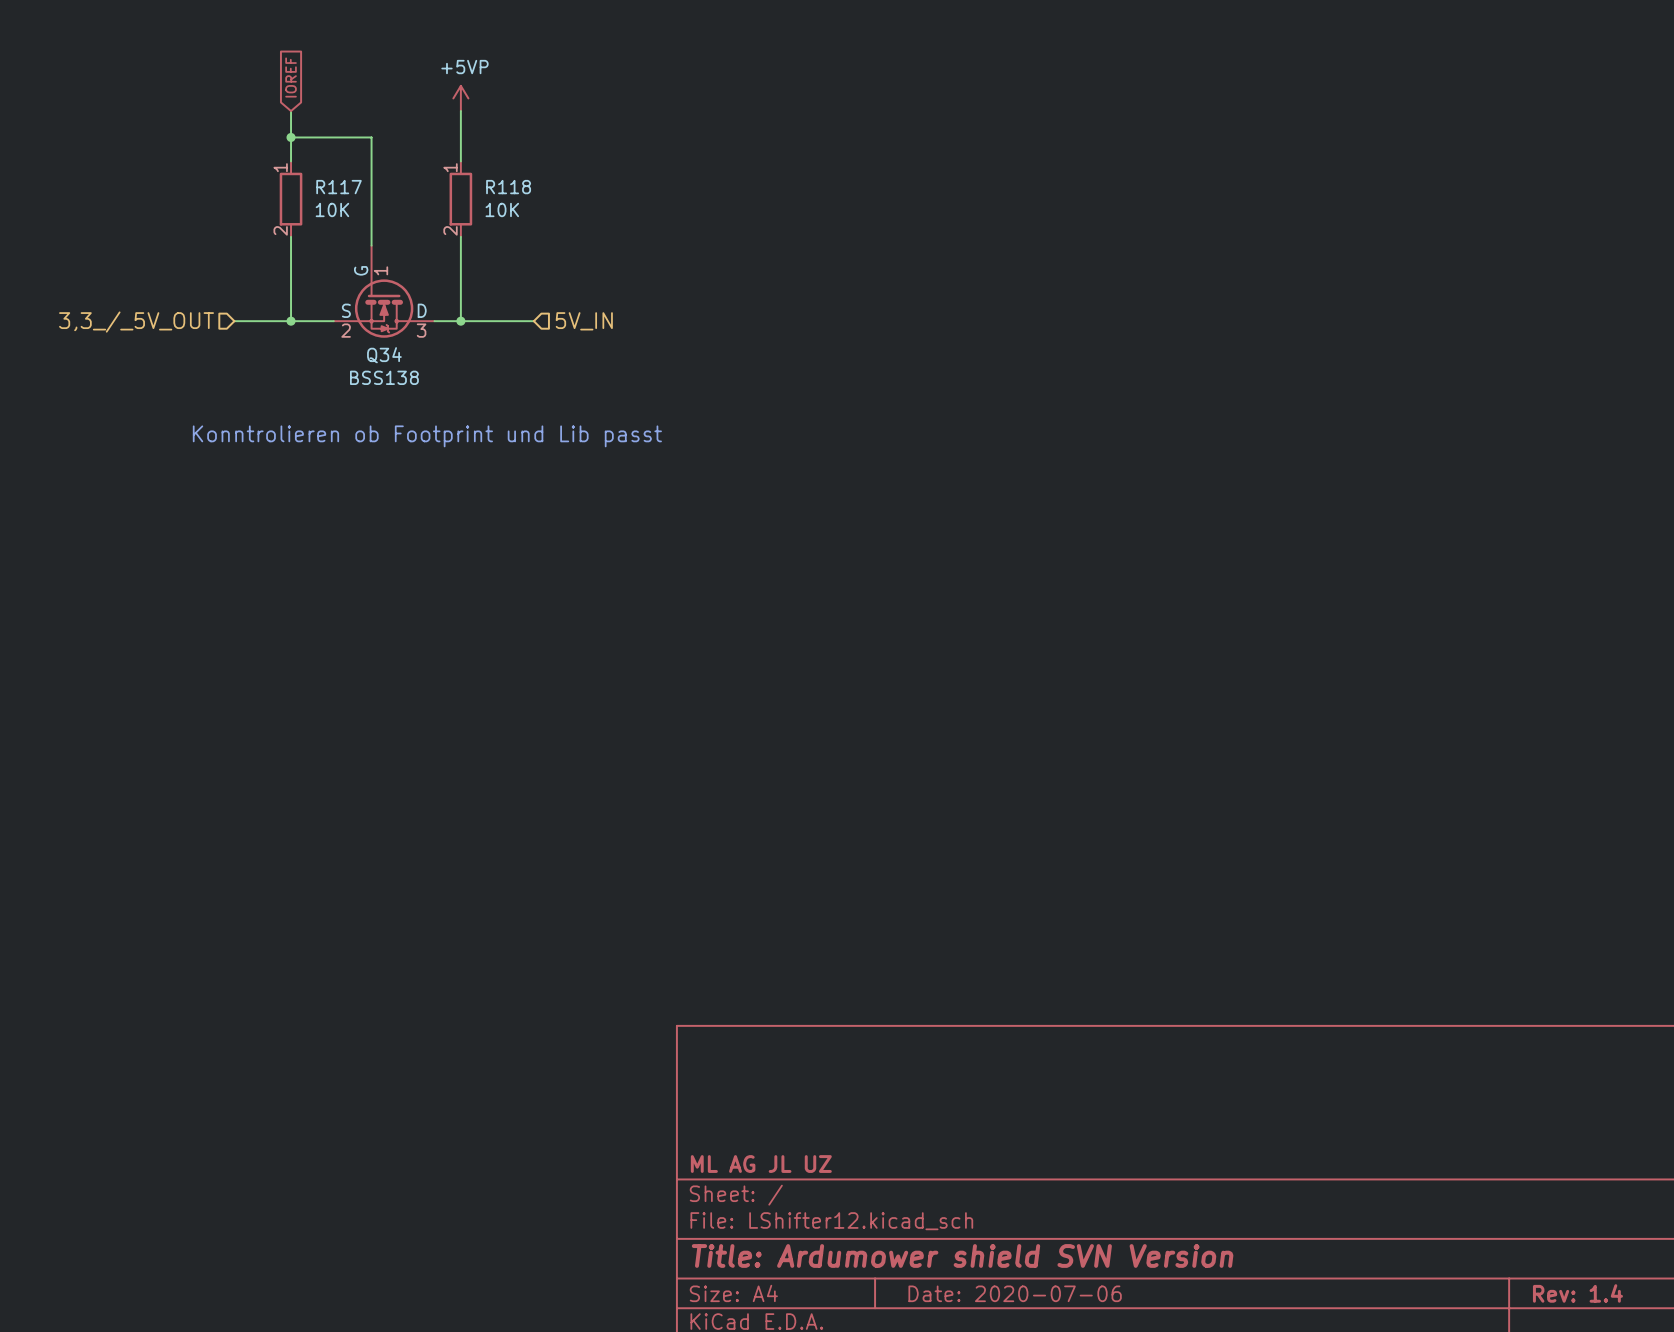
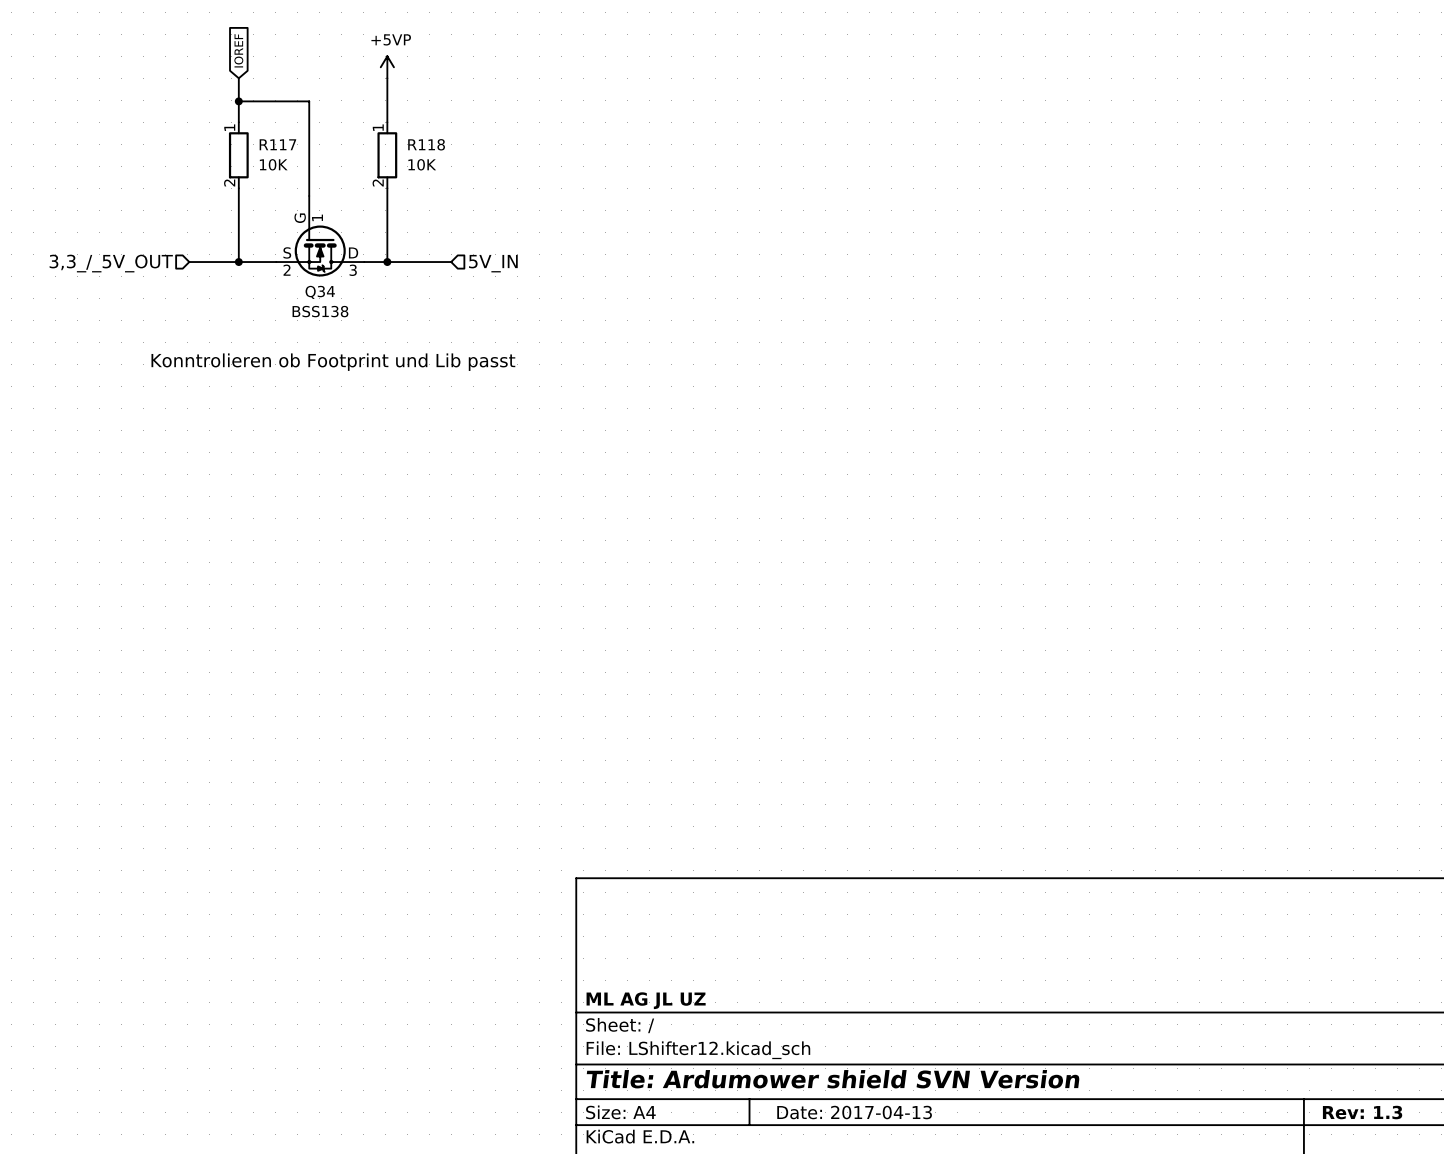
title block: Date: 2020-07-06 (1015, 1293) -> Date: 2017-04-13 (854, 1112)
title block: Rev: 1.4 (1577, 1293) -> Rev: 1.3 (1362, 1112)

